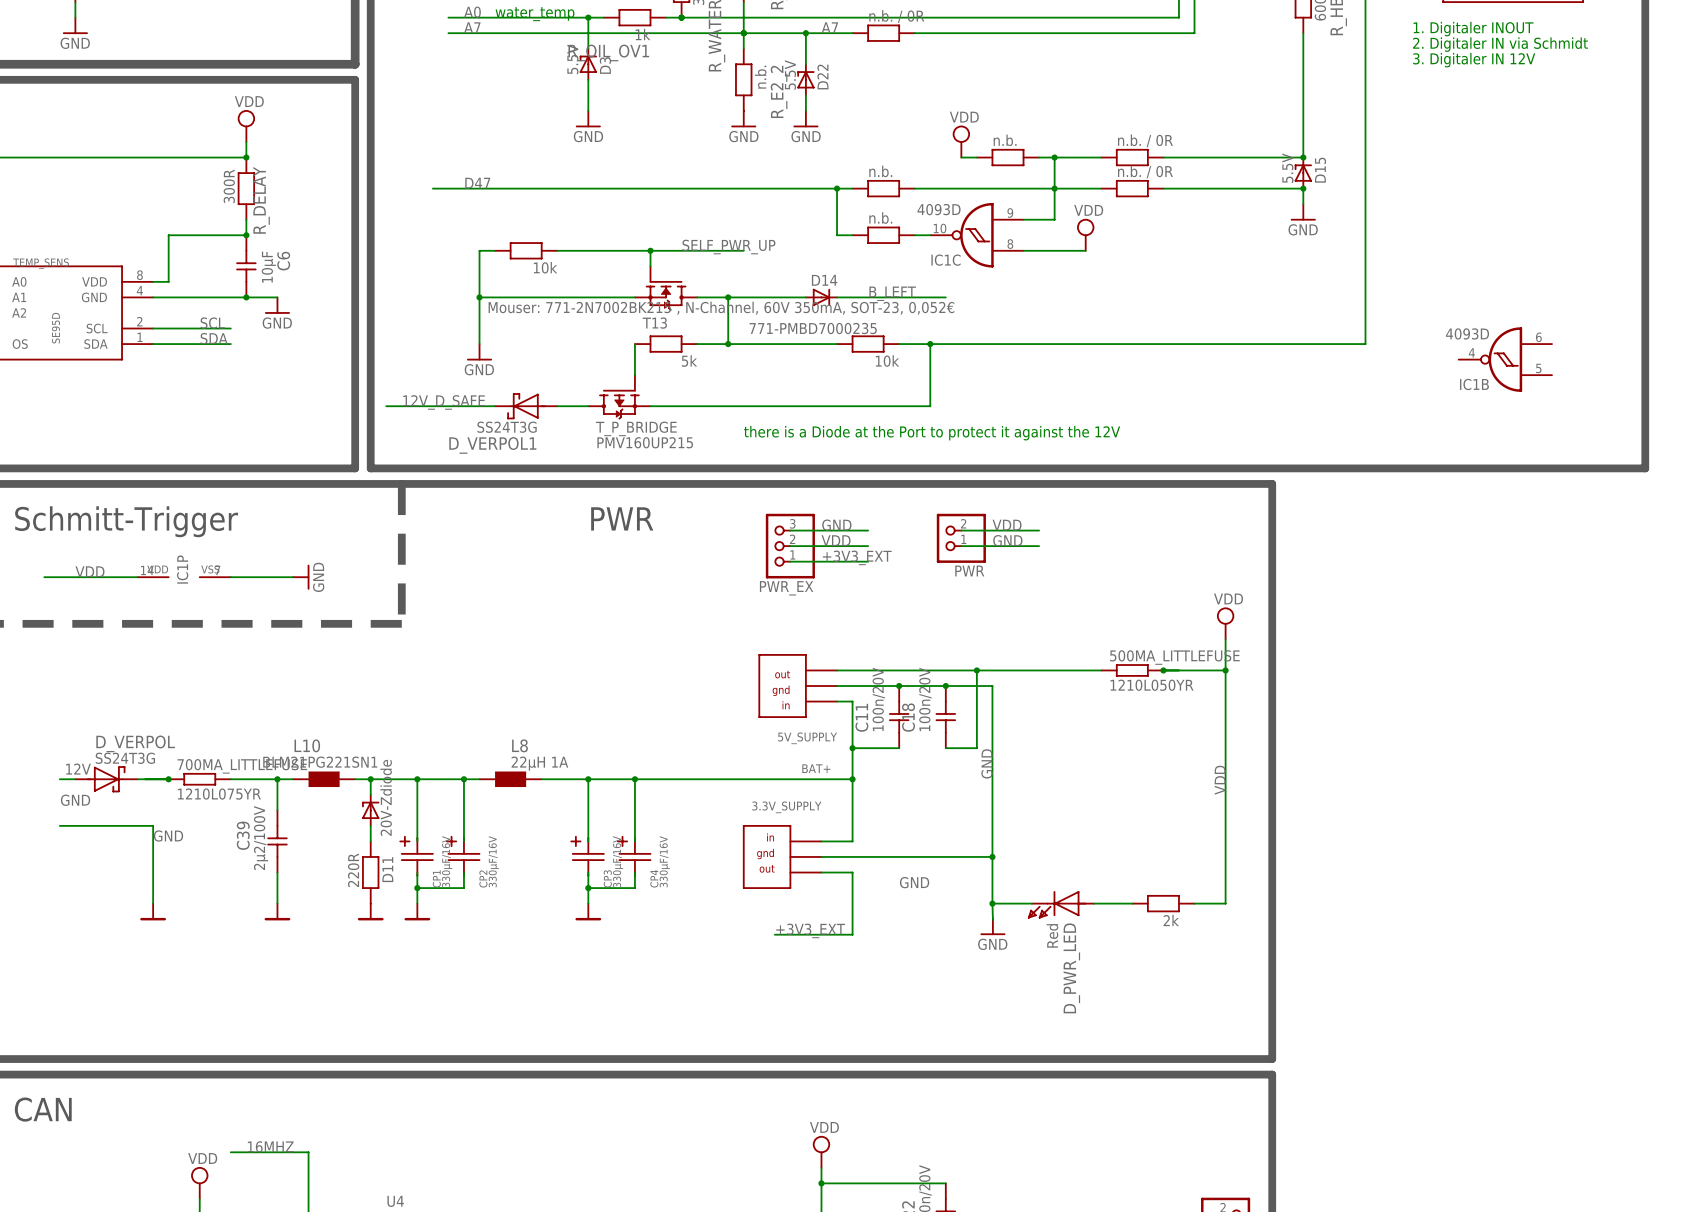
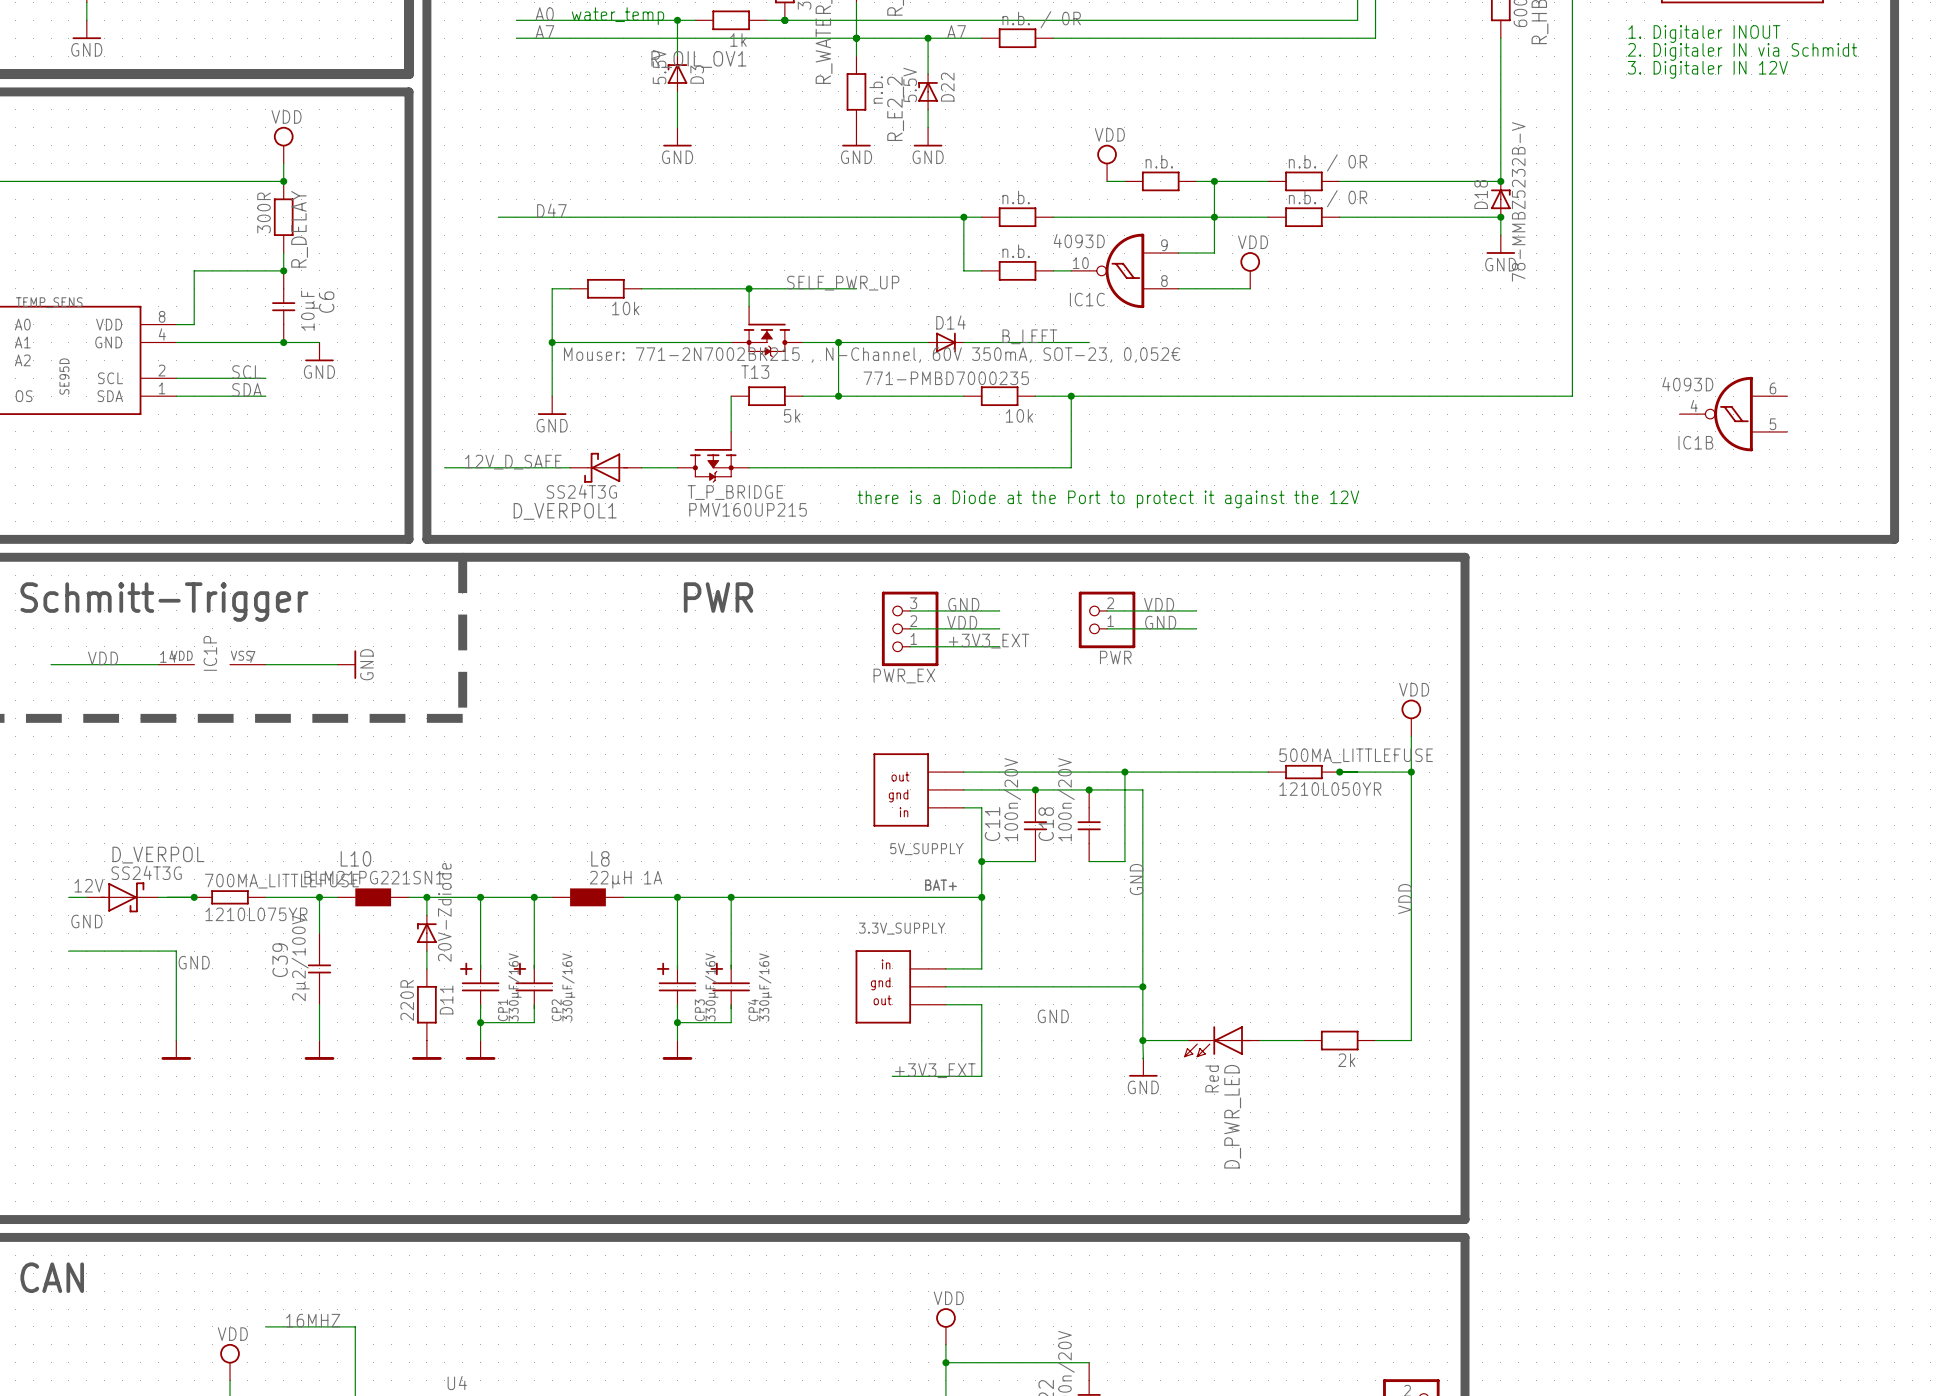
D15: 5.5V (1303, 173) -> none
D18: none -> 78-MMBZ5232B-V (1500, 199)

